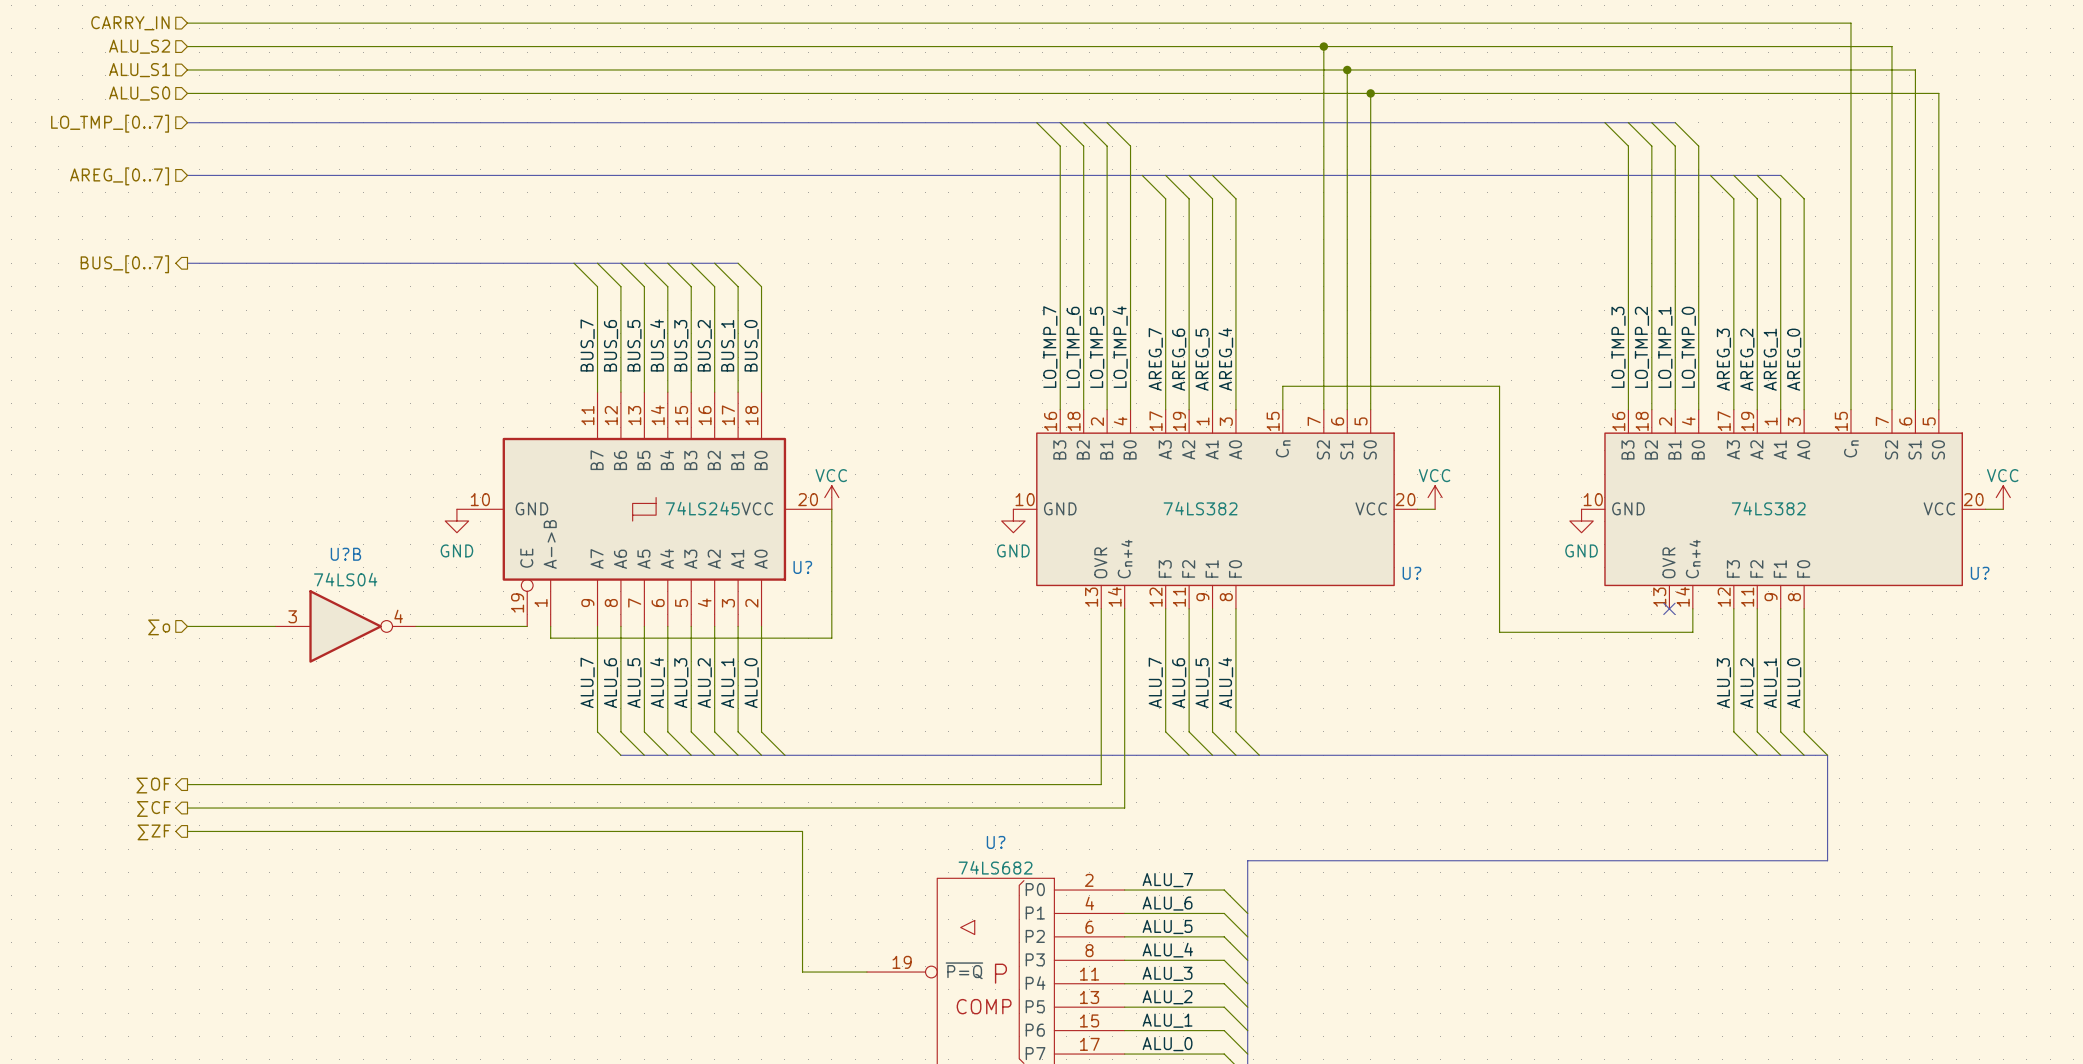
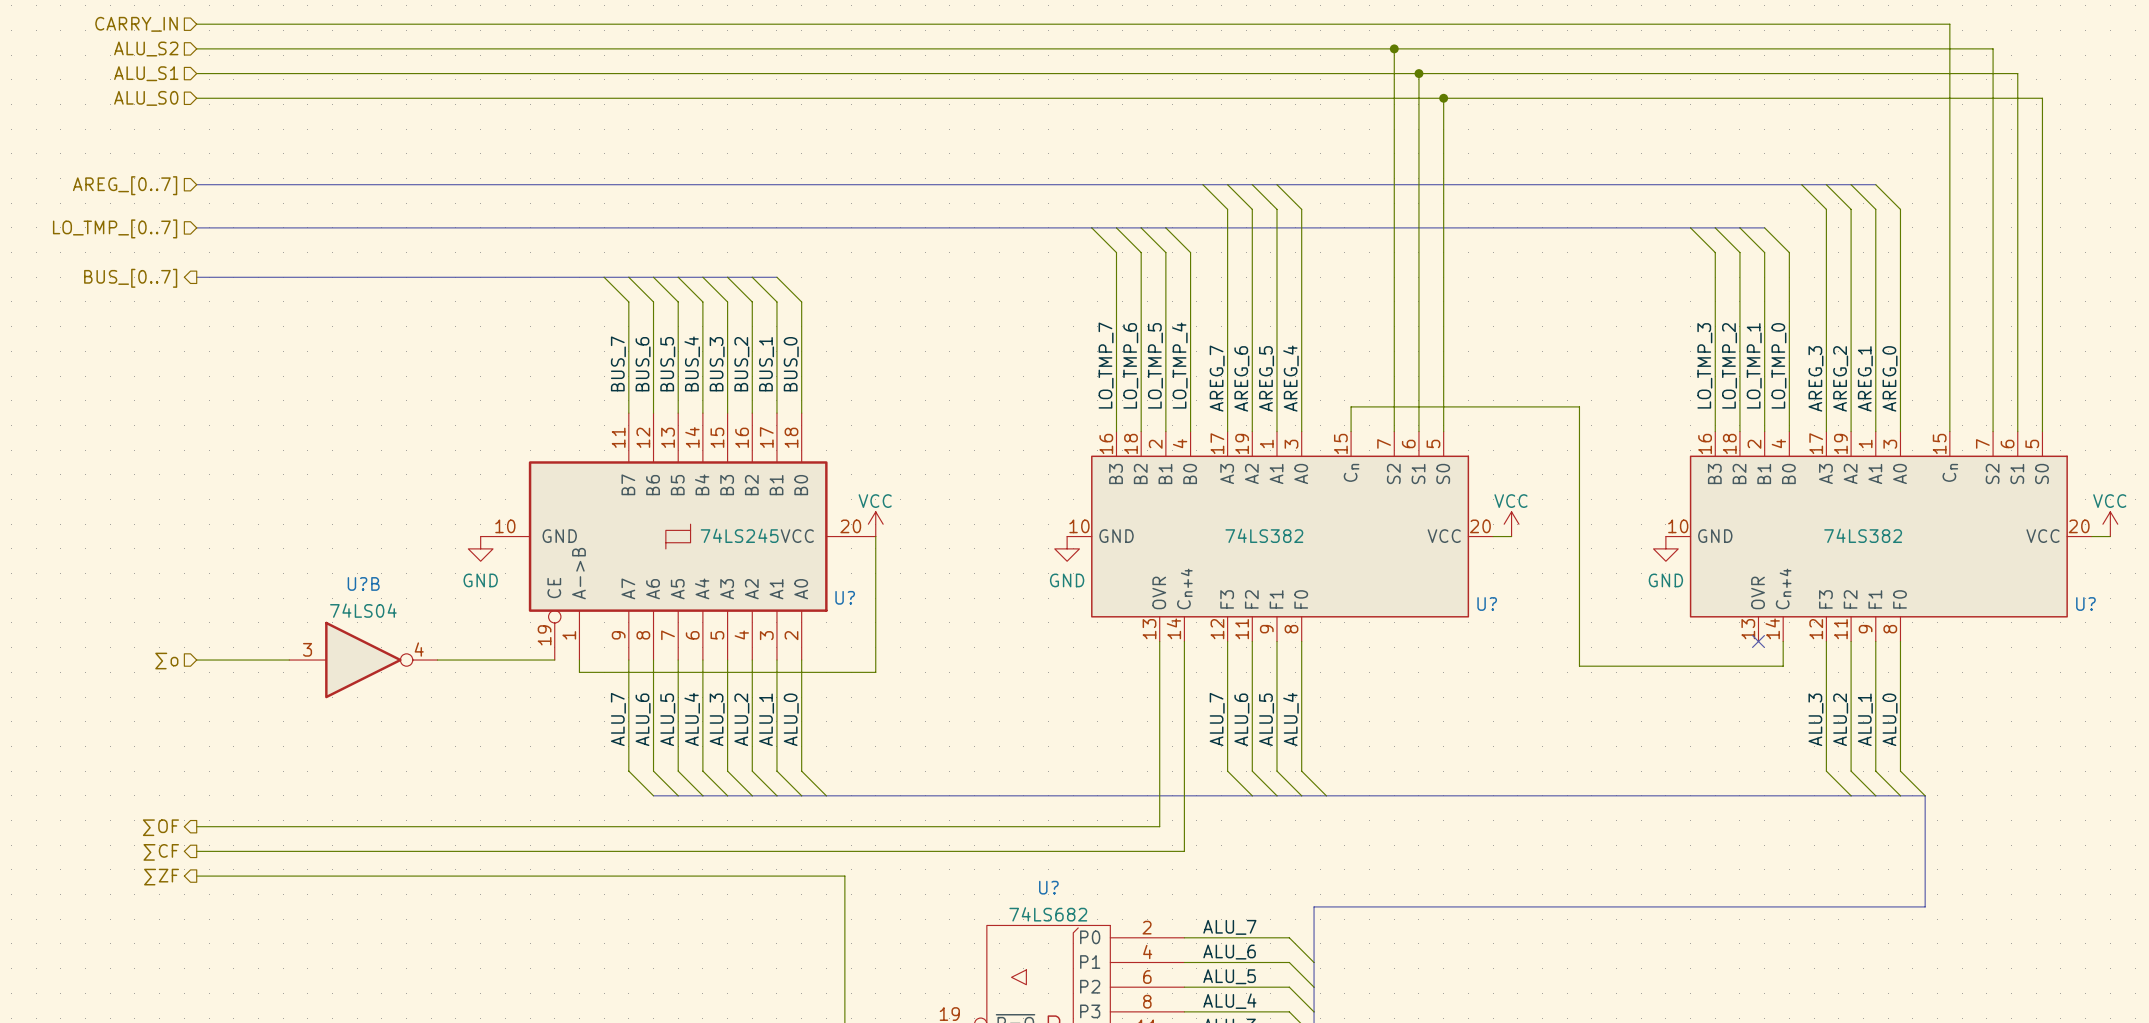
bus: (187, 122) (1675, 122) -> (196, 227) (1764, 227)
wire: (1036, 122) (1060, 146) (1060, 239) -> (1091, 227) (1116, 252)
wire: (1060, 122) (1083, 146) (1083, 239) -> (1116, 227) (1141, 252)
wire: (1083, 122) (1107, 146) (1107, 239) -> (1141, 227) (1165, 252)
wire: (1107, 122) (1130, 146) -> none
wire: (1604, 122) (1628, 146) (1628, 239) -> (1690, 227) (1715, 252)
wire: (1628, 122) (1651, 146) (1651, 239) -> (1715, 227) (1739, 252)
wire: (1651, 122) (1675, 146) (1675, 239) -> (1739, 227) (1764, 252)
wire: (1675, 122) (1698, 146) (1698, 239) -> (1764, 227) (1789, 252)
hierarchical label position: LO_TMP_[0..7] (110, 123) -> LO_TMP_[0..7] (115, 228)
wire: (1130, 146) (1130, 239) -> (1165, 227) (1190, 252)

